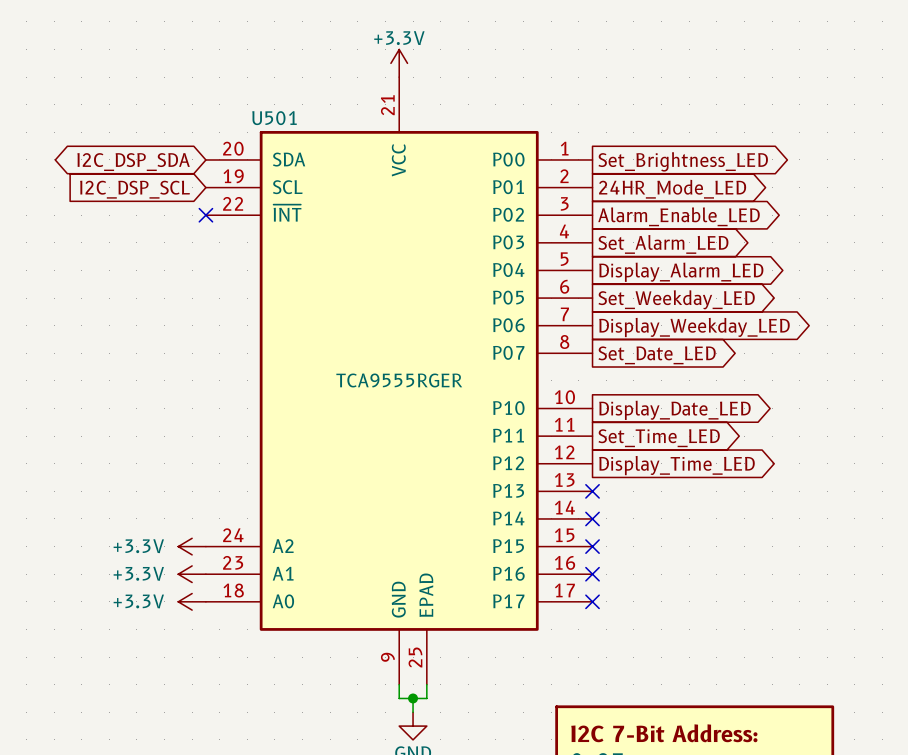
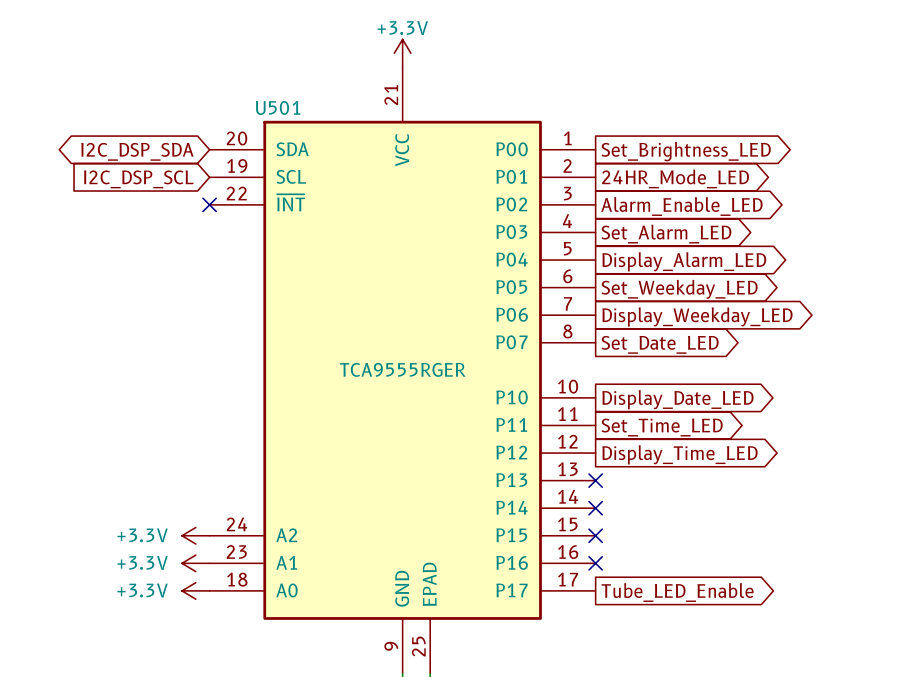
no-connect mark: (592, 601) -> none
global label: none -> Tube_LED_Enable (677, 592)

